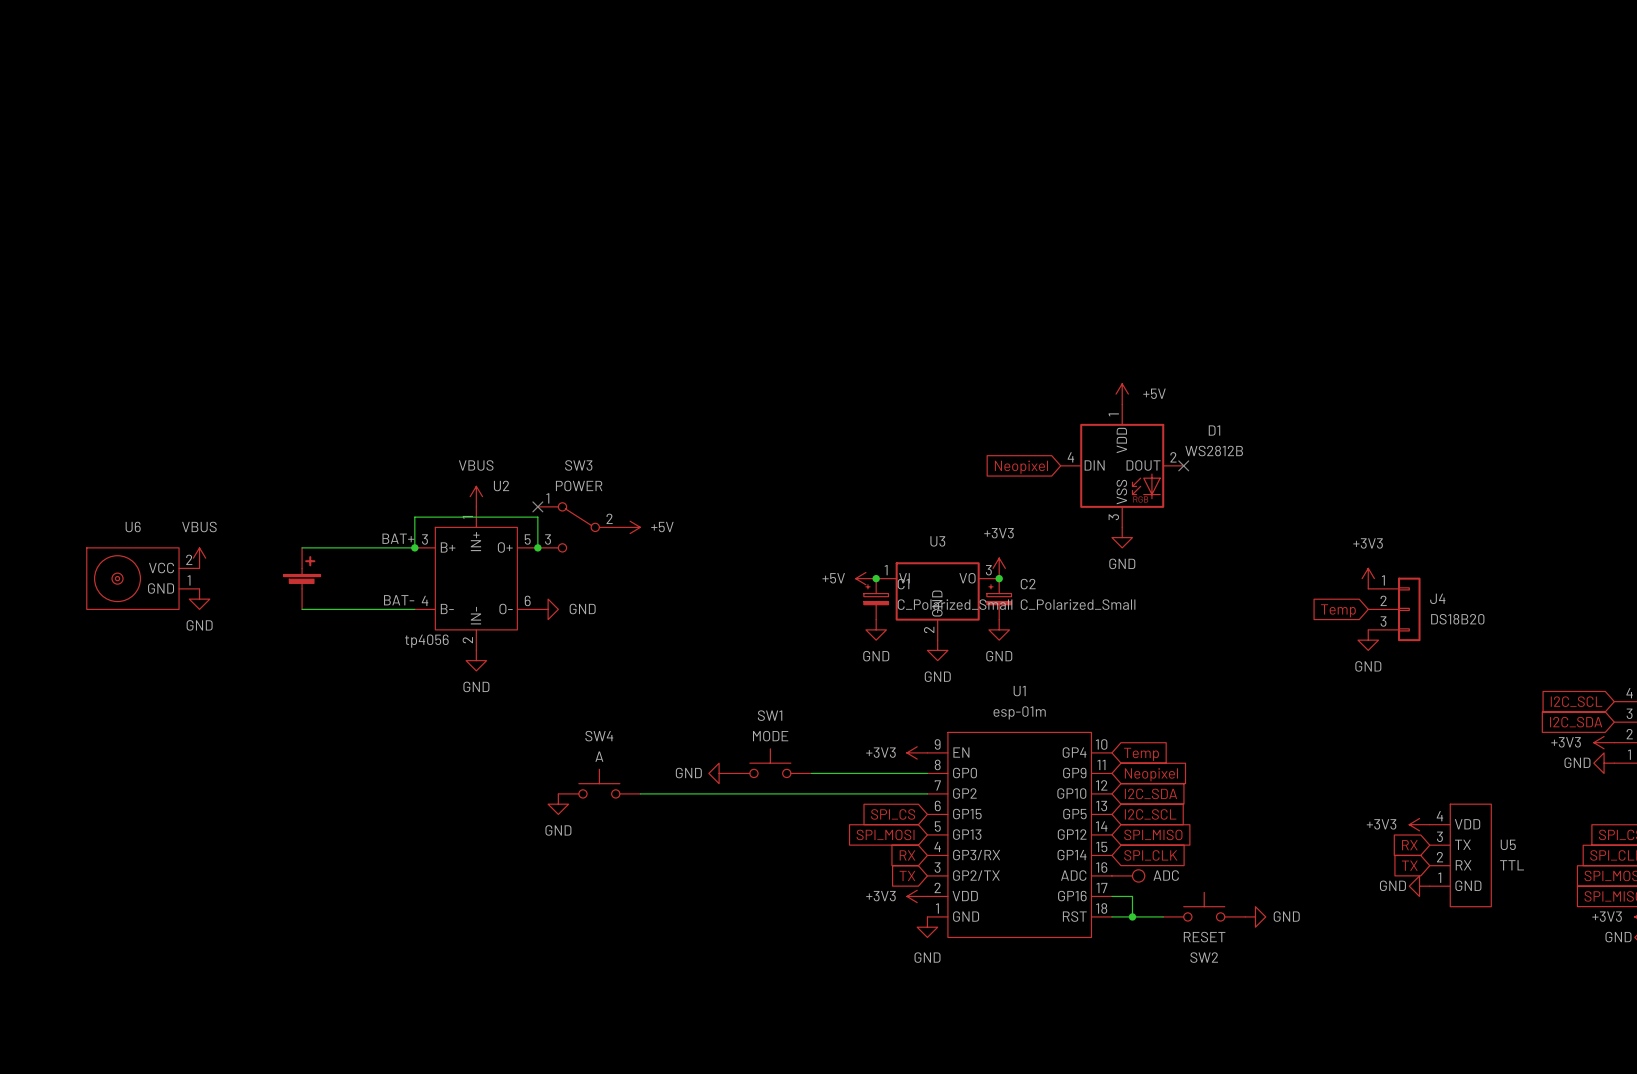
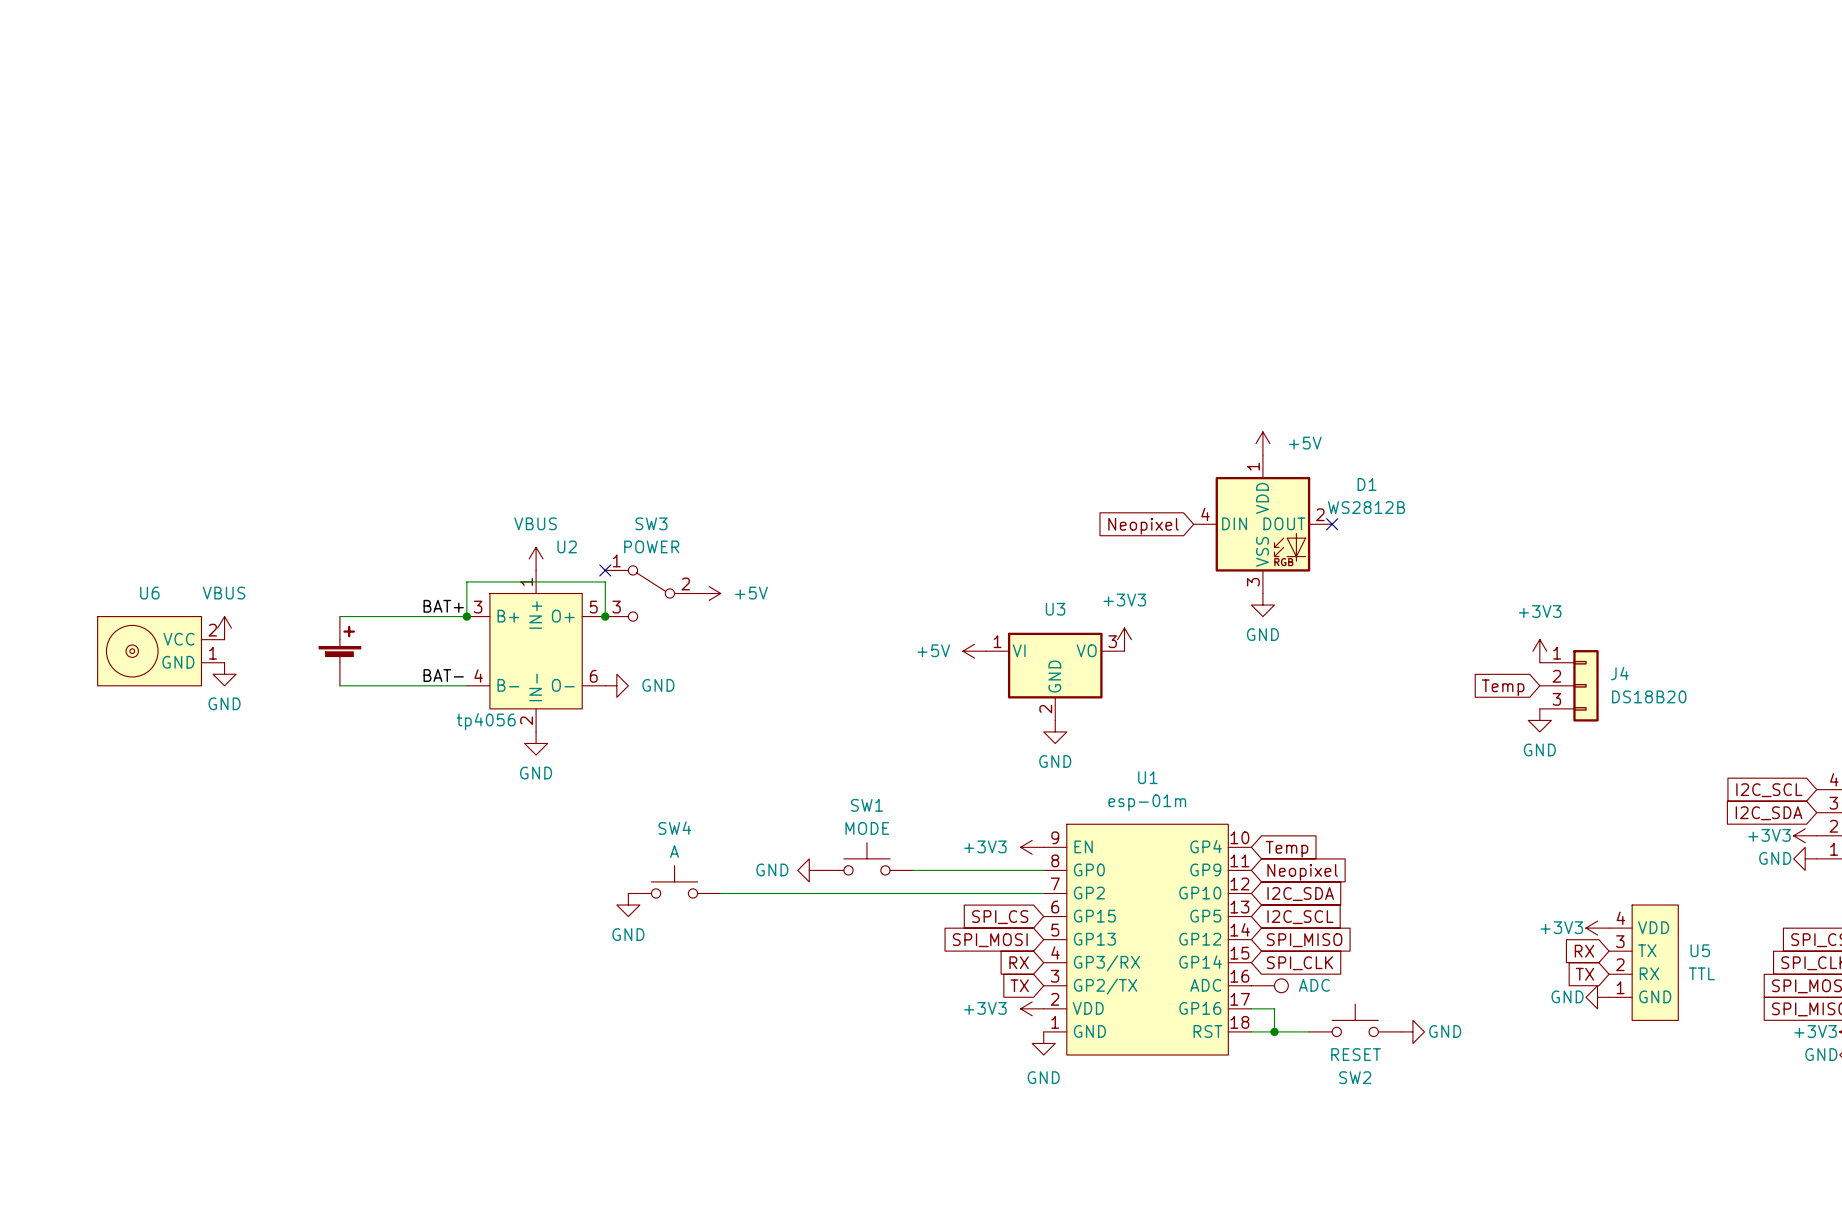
junction: (876, 578) -> none
junction: (999, 578) -> none
C1: C_Polarized_Small (876, 599) -> none
C2: C_Polarized_Small (999, 599) -> none
power symbol: GND (876, 629) -> none
power symbol: GND (999, 629) -> none

